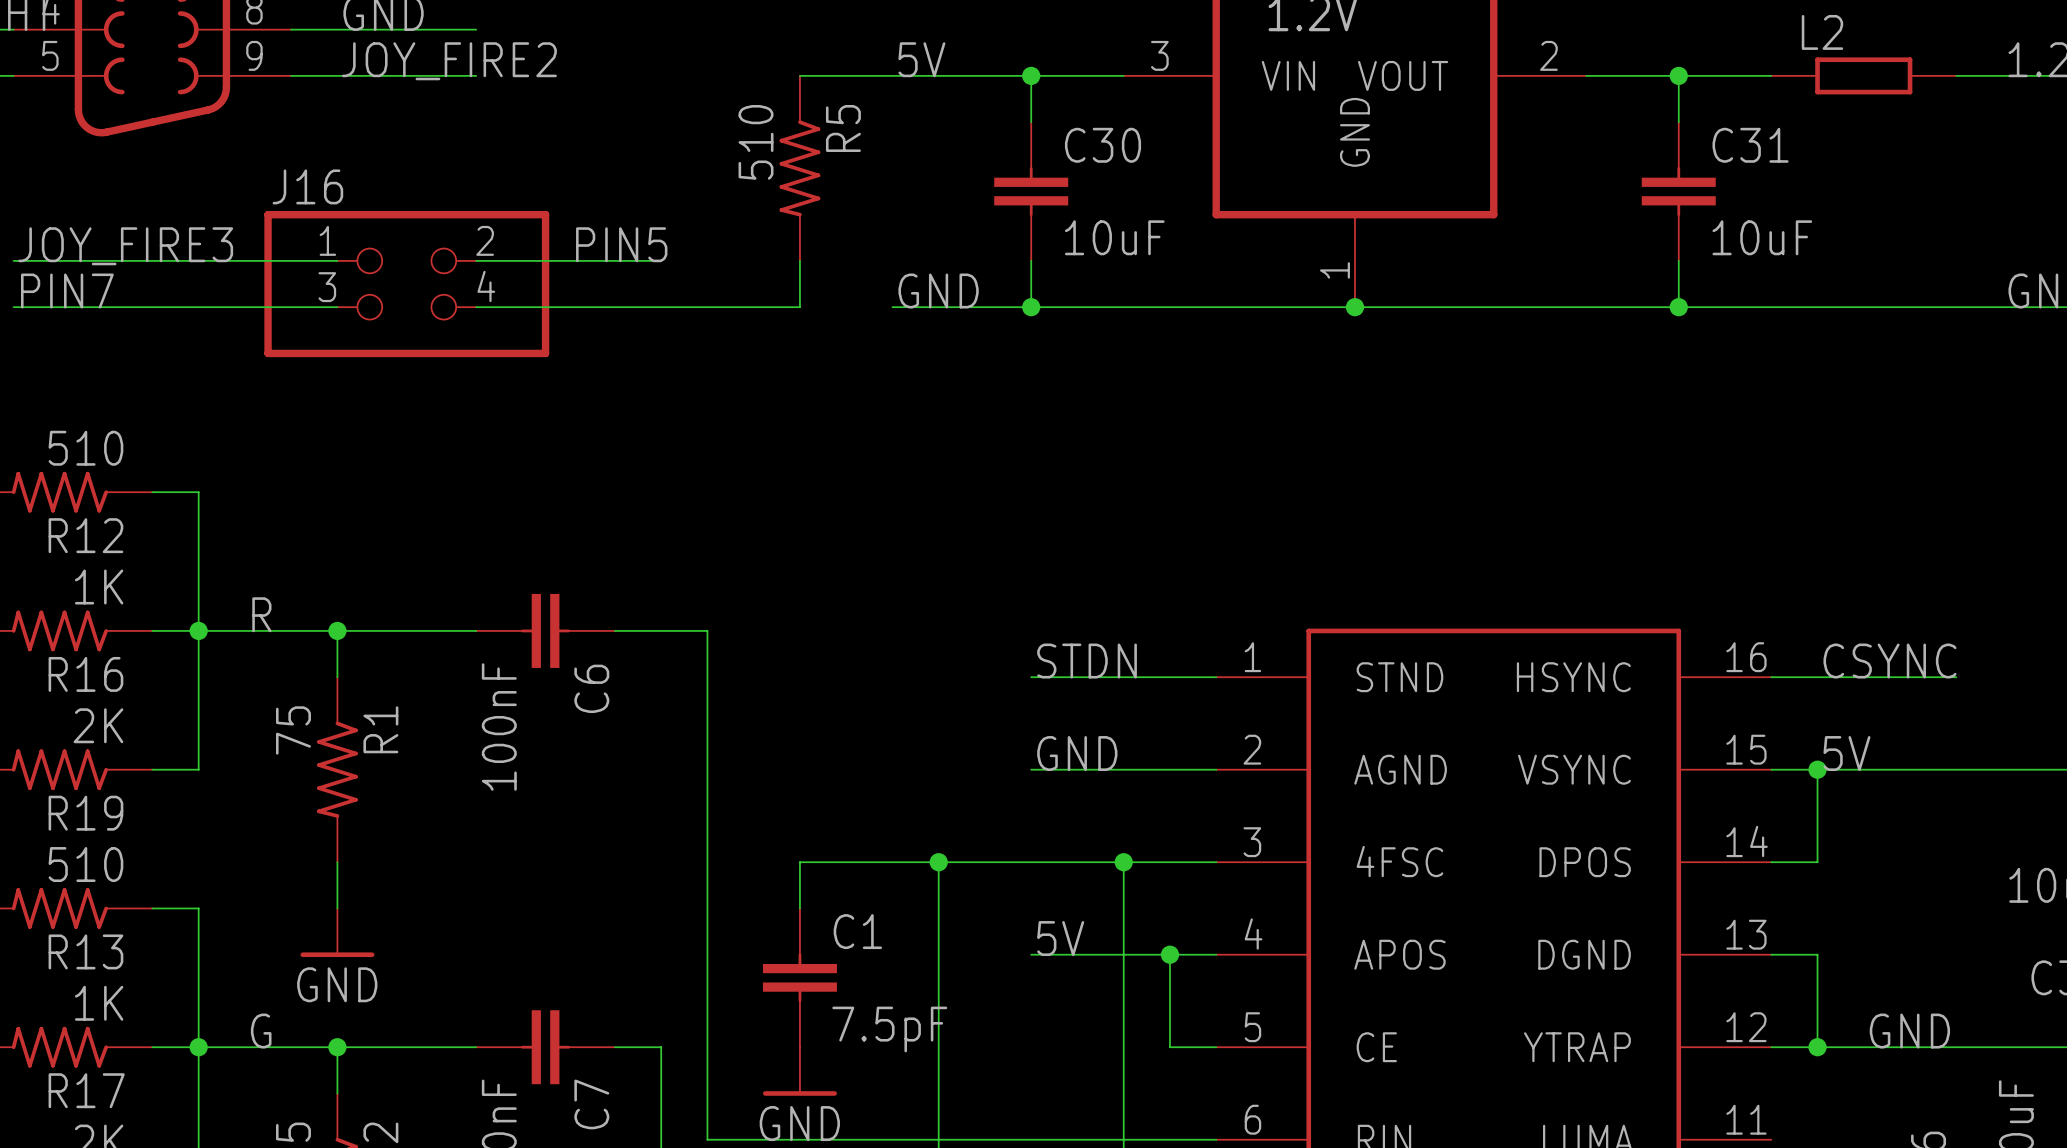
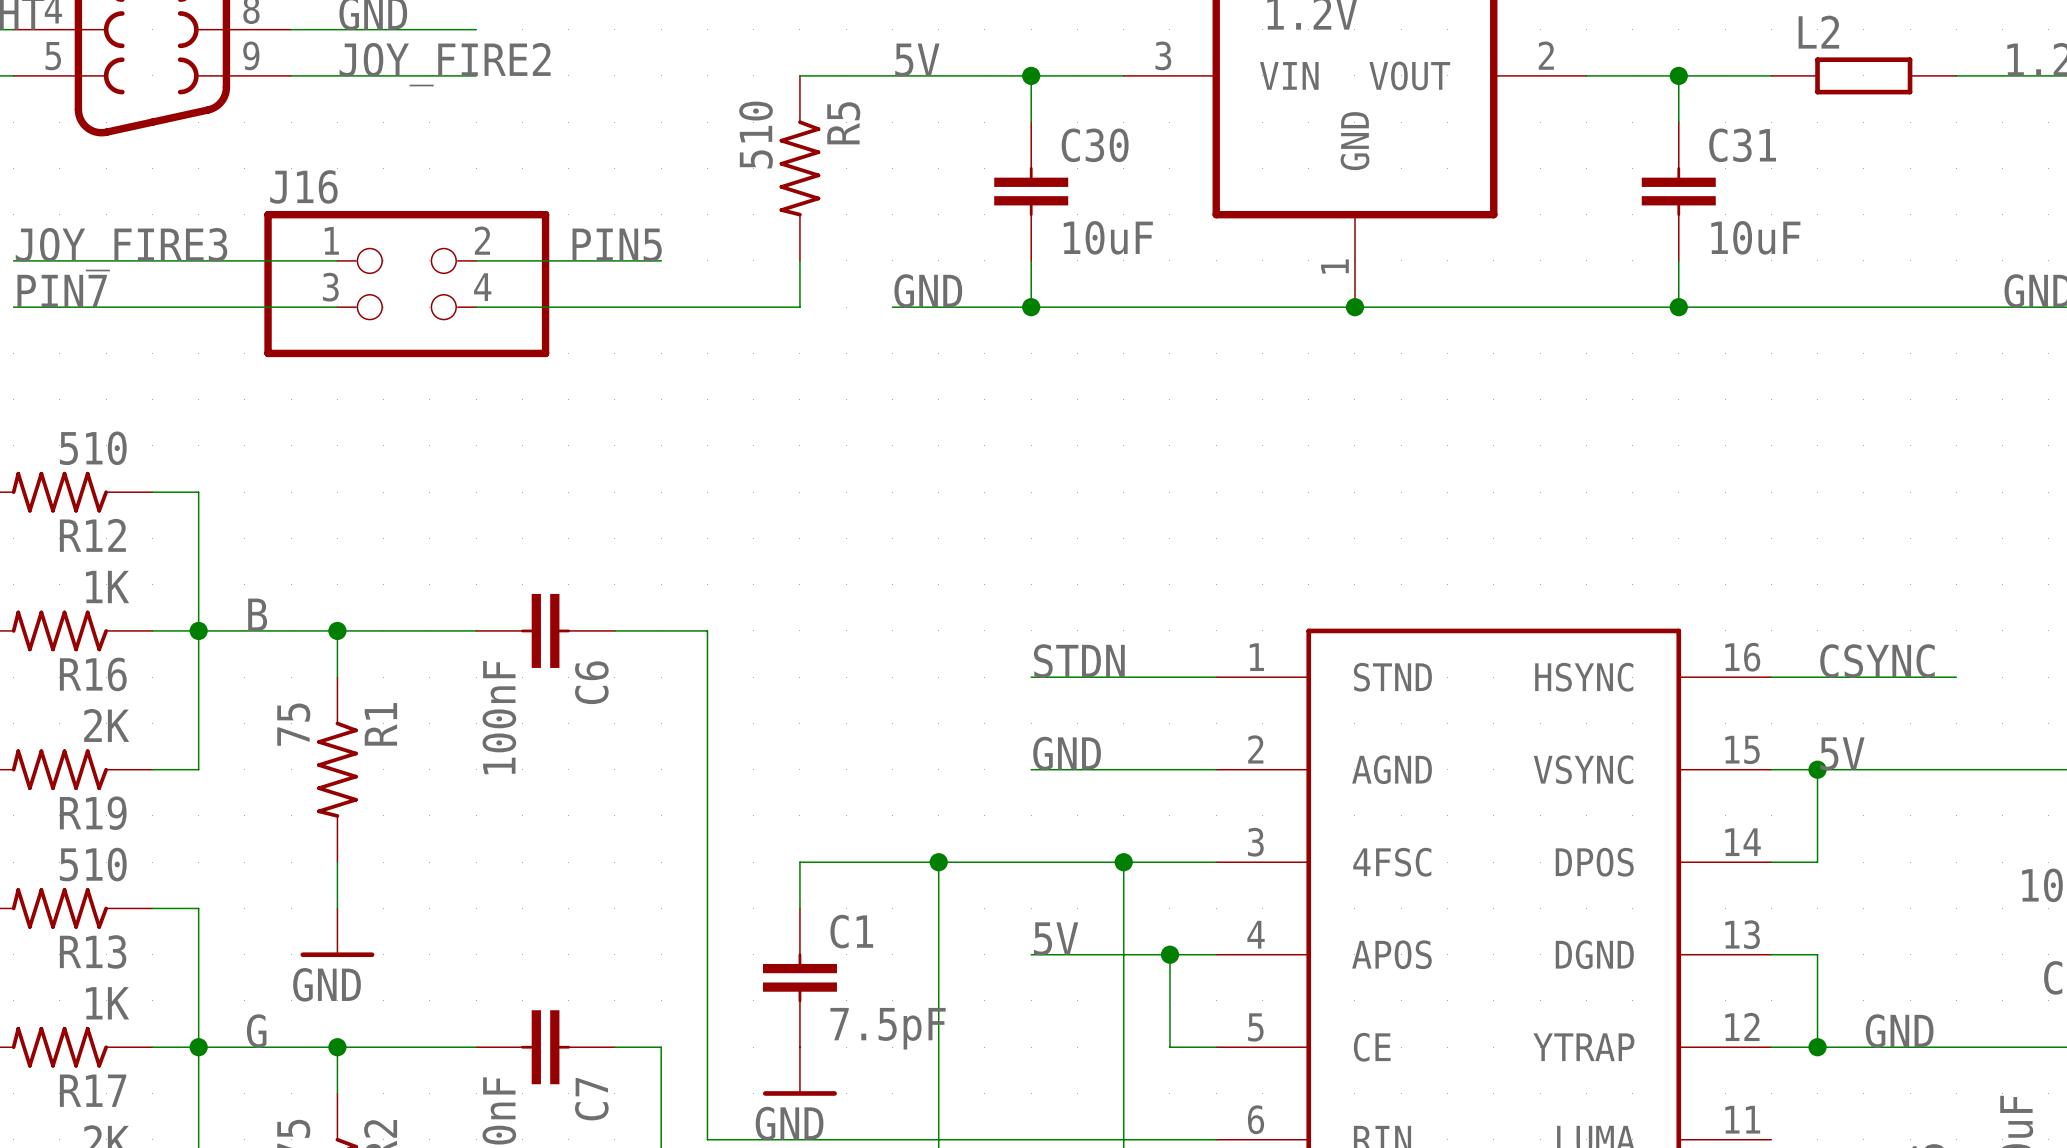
label: R (261, 614) -> B (257, 614)

